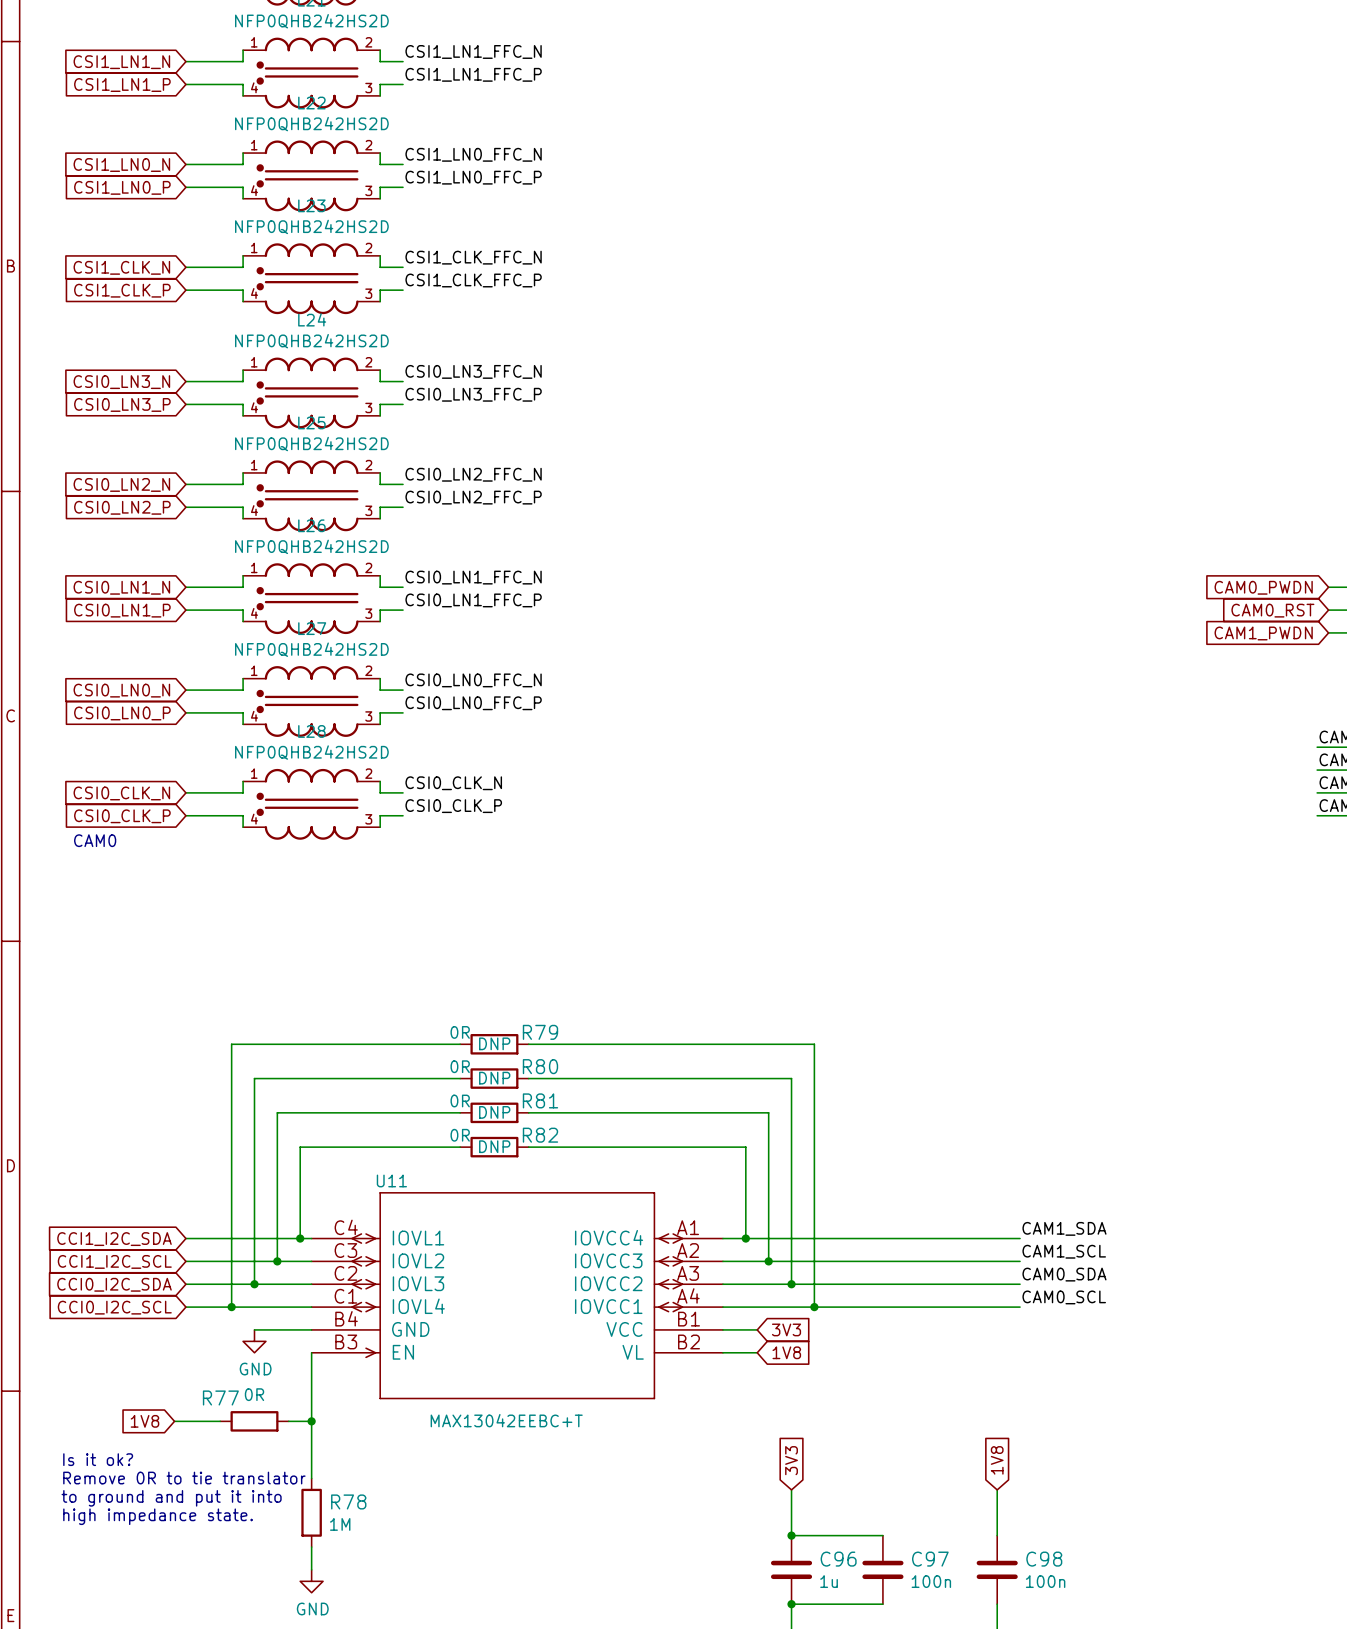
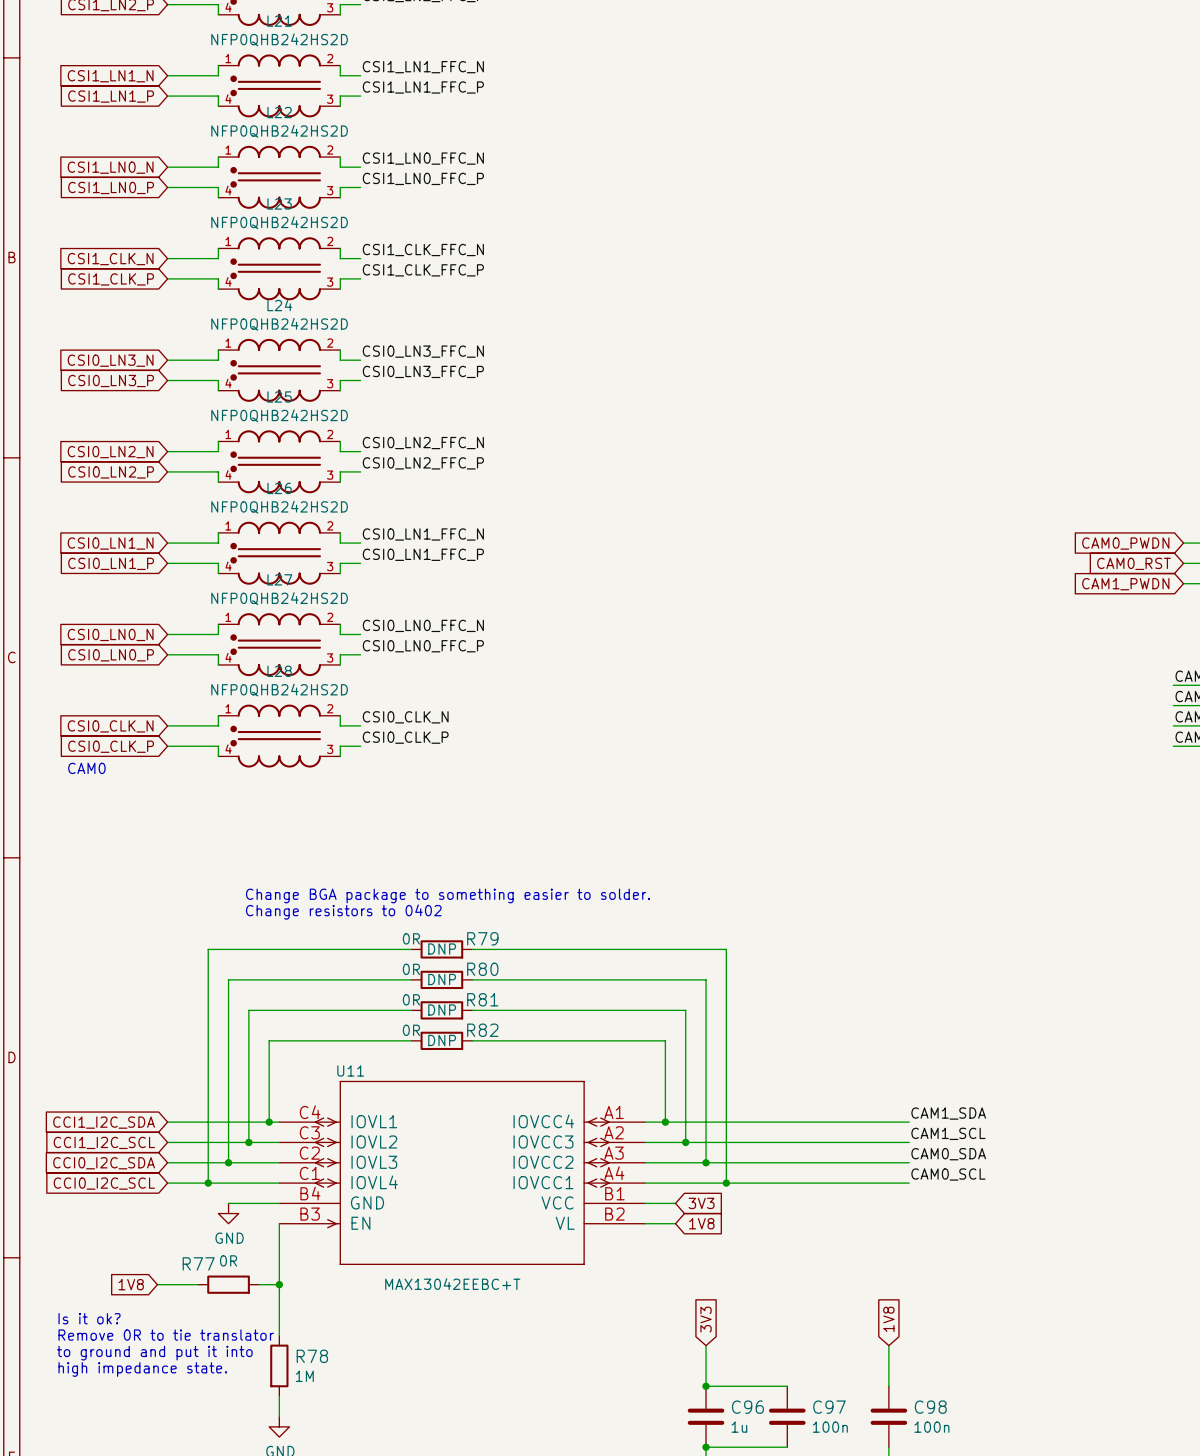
text: none -> Change BGA package to something easier to solder. (448, 895)
text: none -> Change resistors to 0402 (343, 912)

